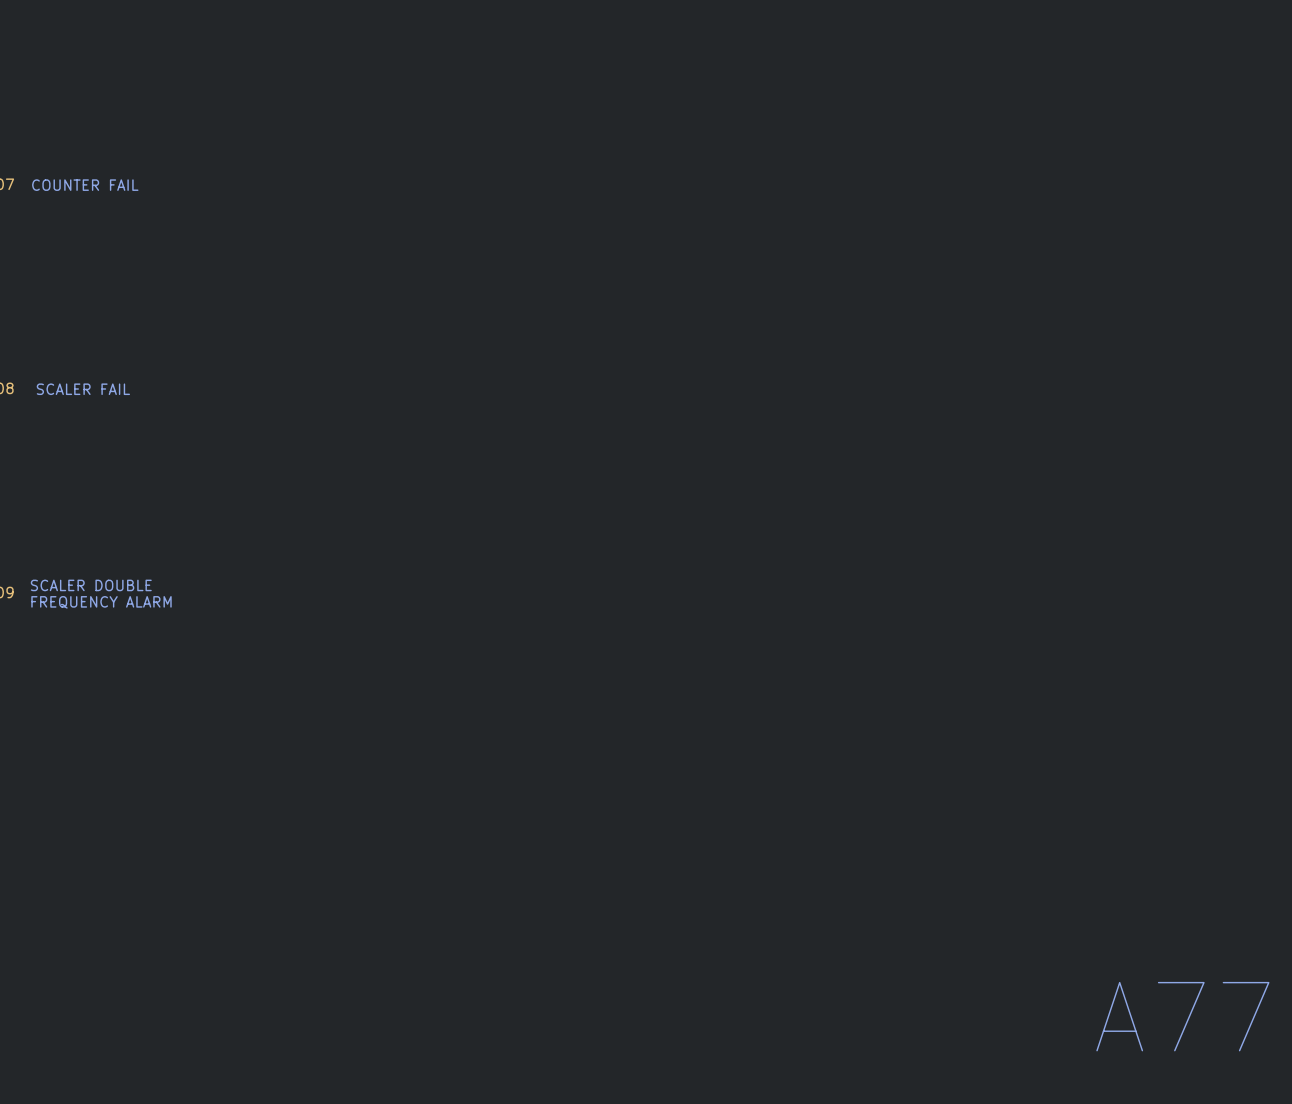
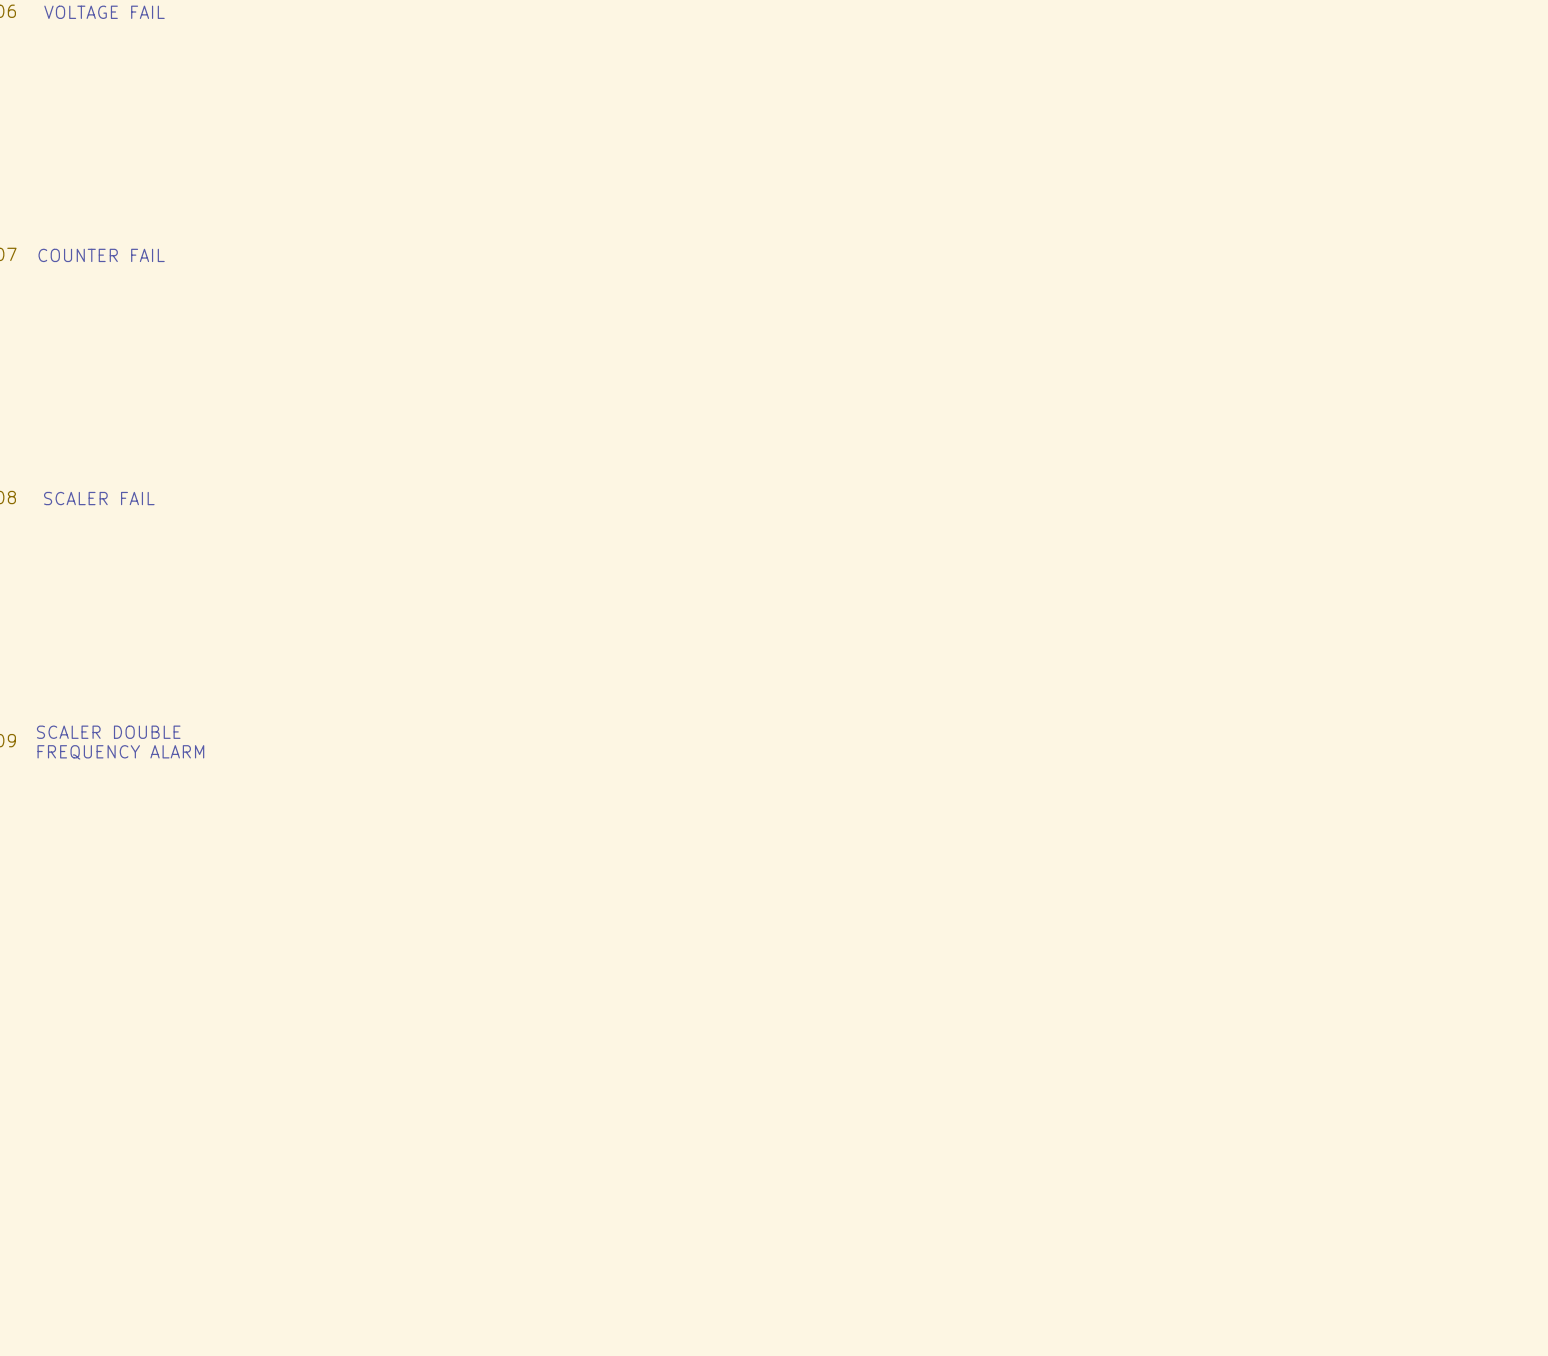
text: A77 (1182, 1016) -> none

